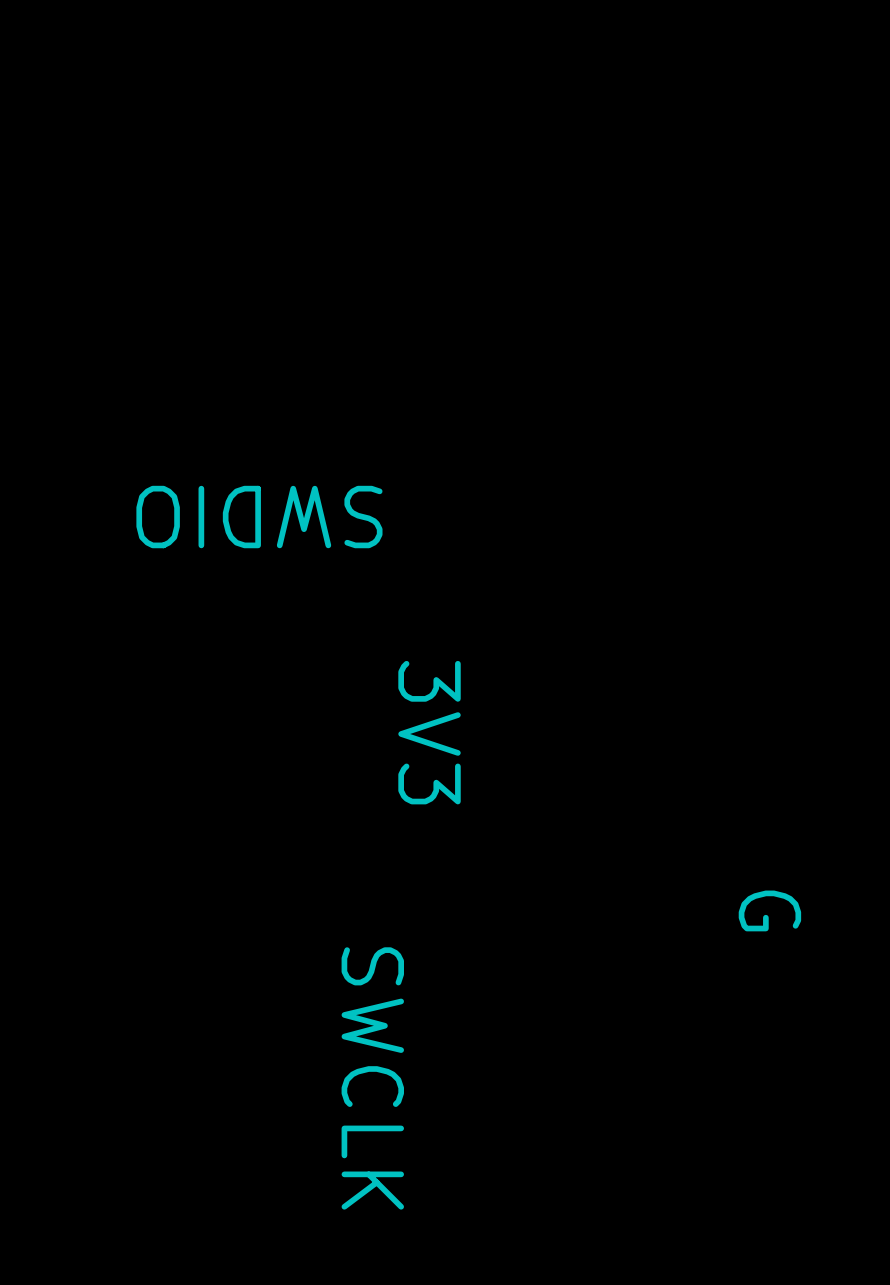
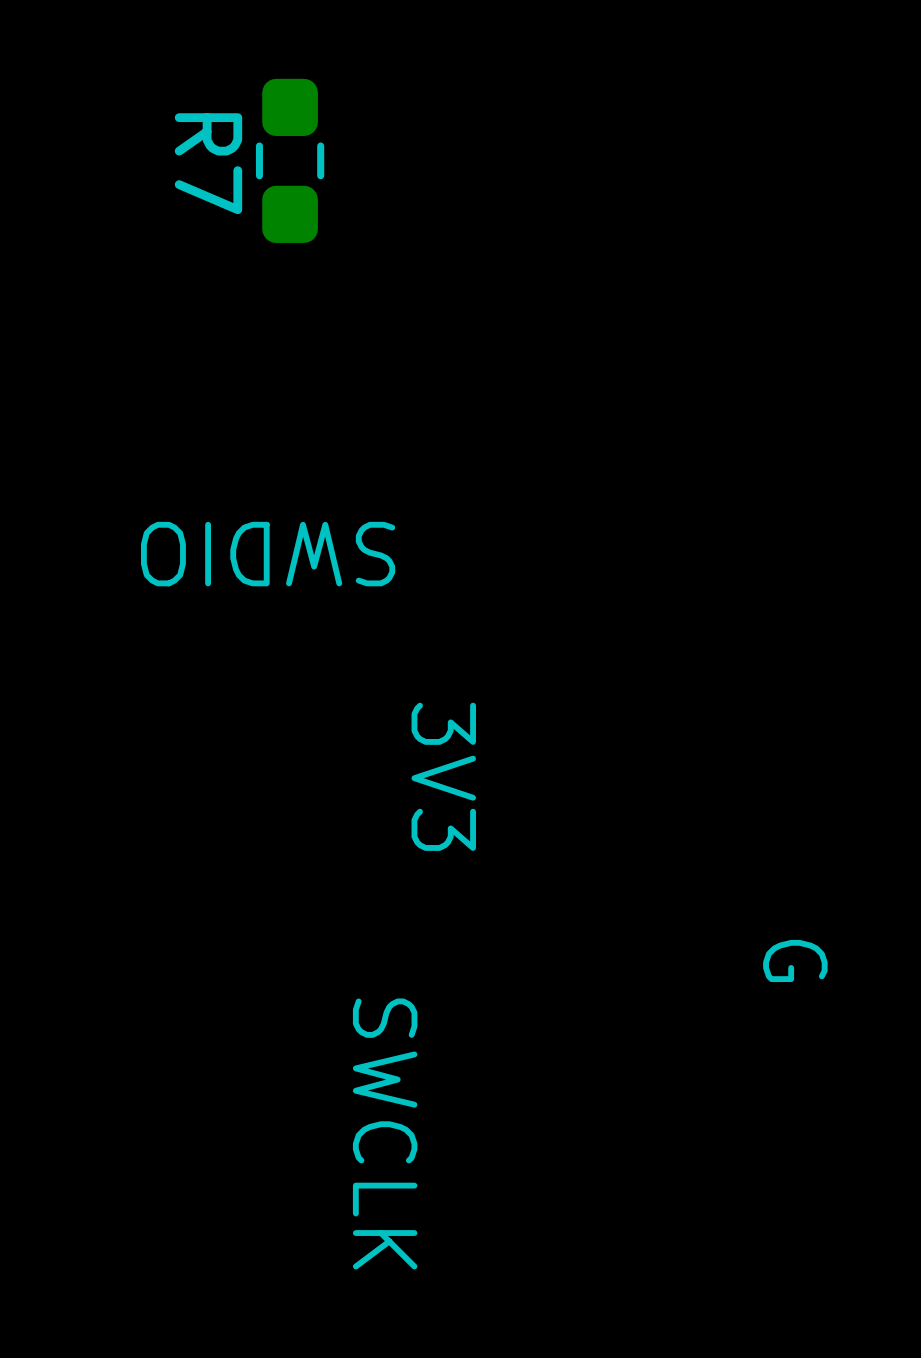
R7: none -> (290, 160)

